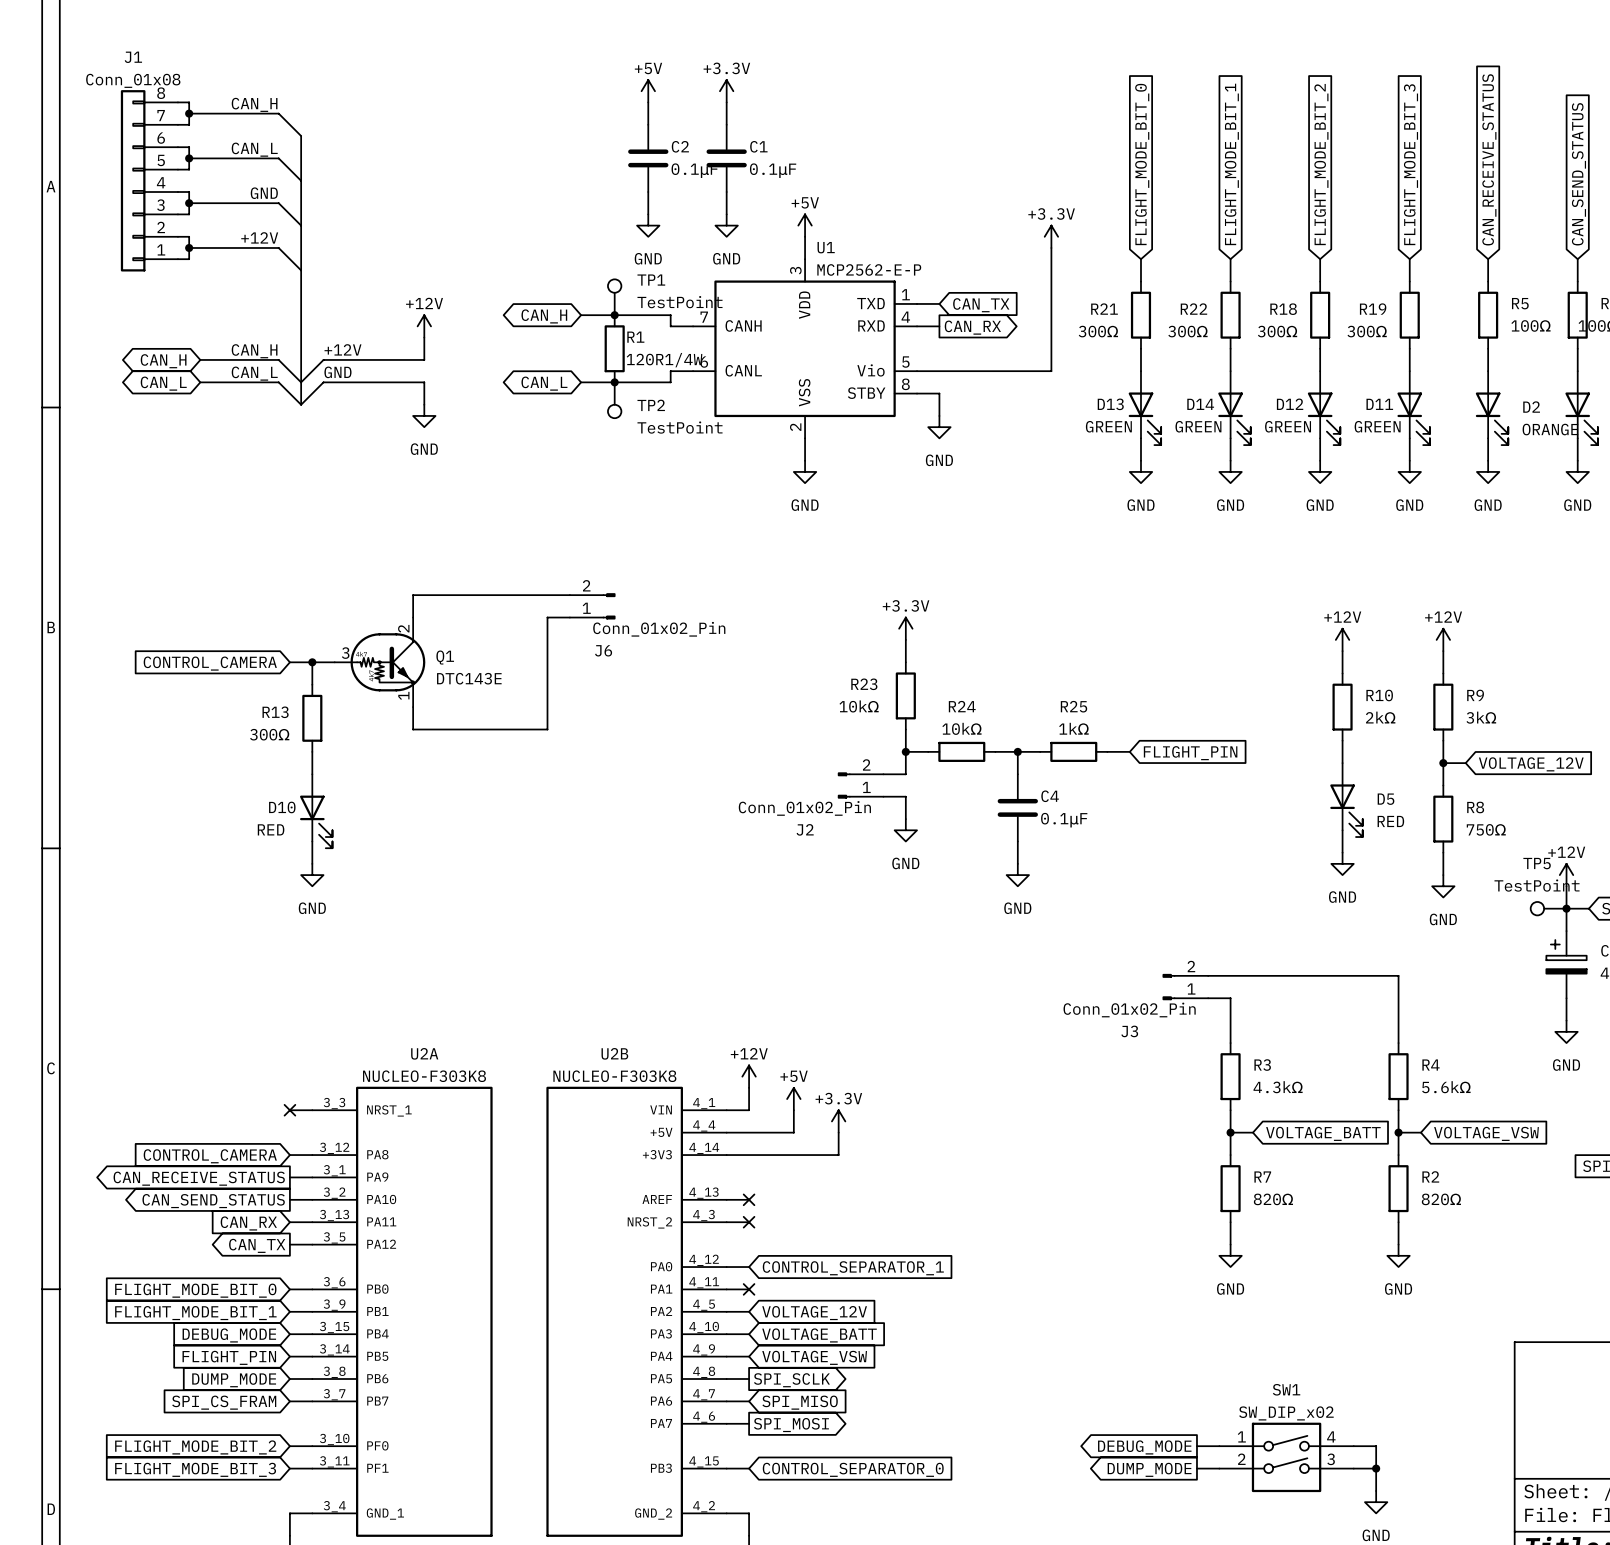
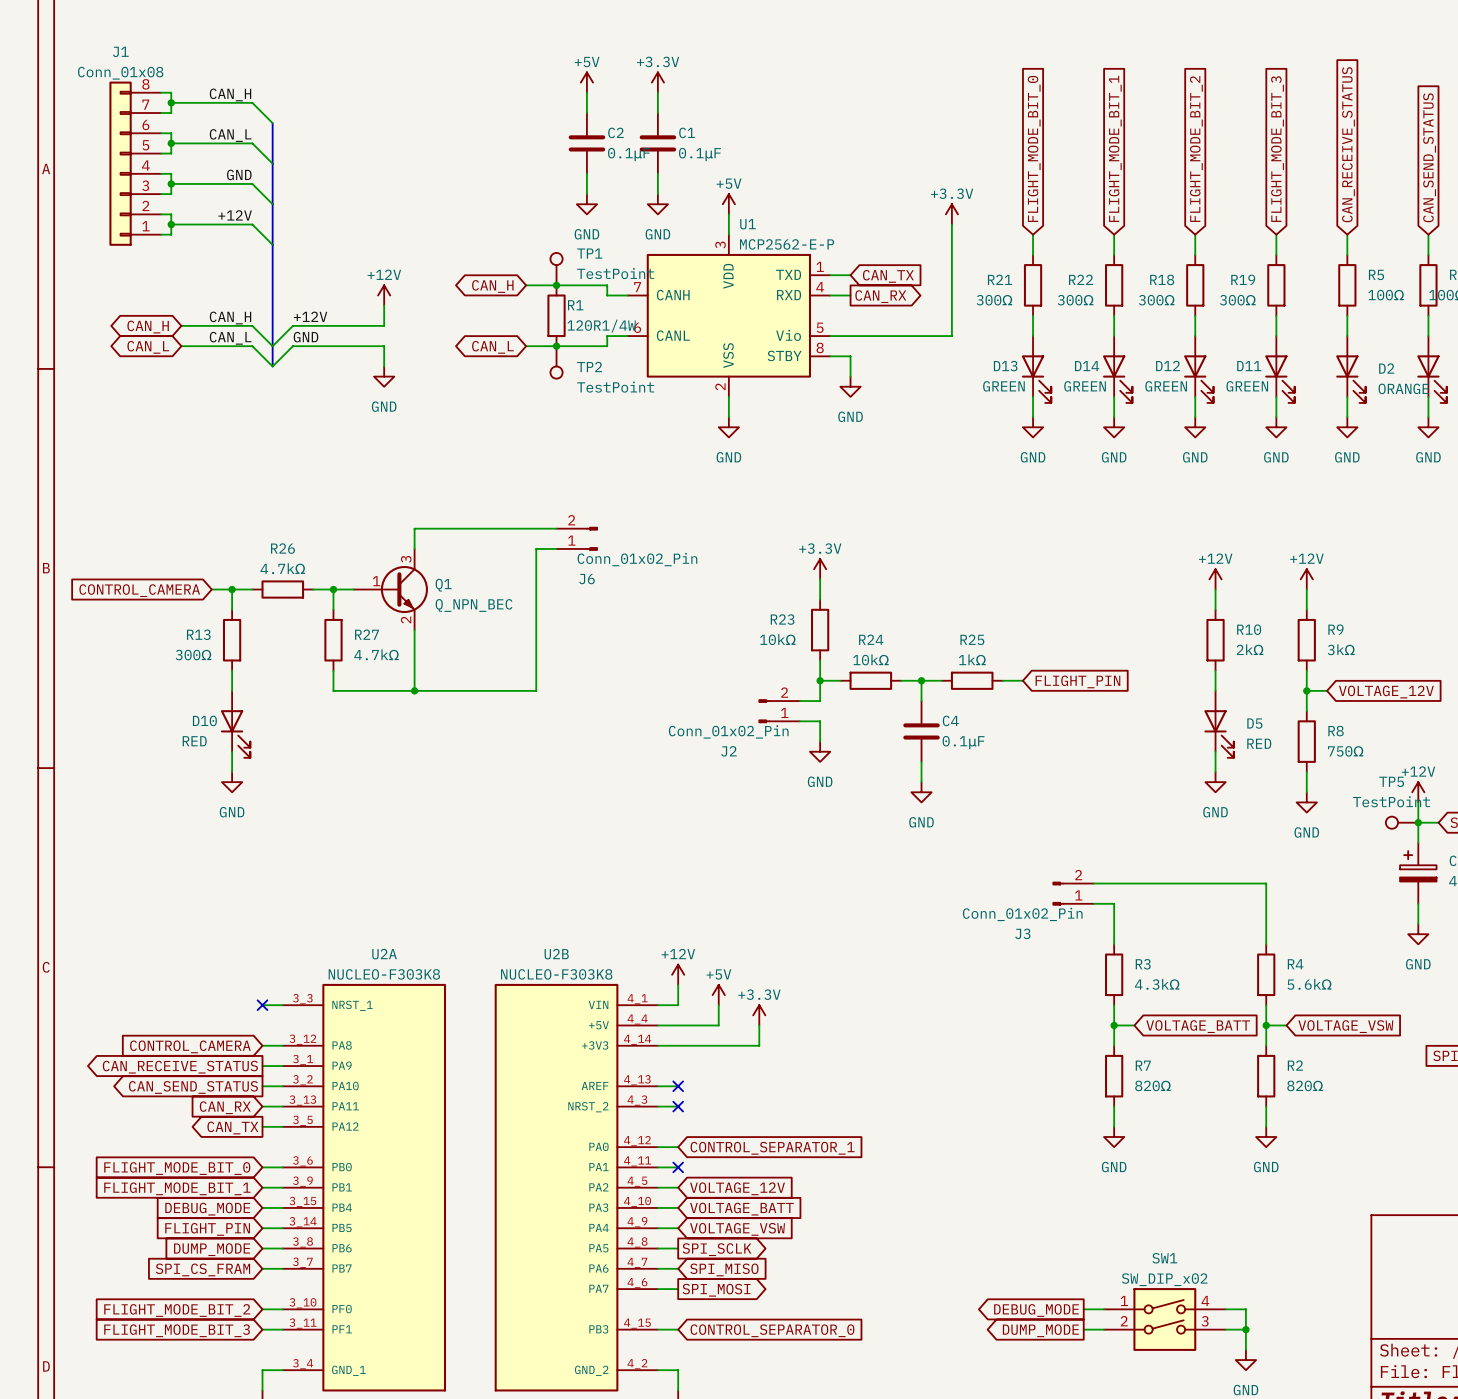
wire: (569, 595) (413, 595) (413, 617) -> (556, 528) (414, 528) (414, 548)
J6 position: (592, 606) -> (577, 538)
wire: none -> (556, 548) (536, 548) (536, 690) (333, 690) (333, 670)
Q1 symbol: [334, 617, 426, 708] -> [353, 548, 428, 631]
wire: (569, 617) (547, 617) (547, 729) (413, 729) (413, 707) -> none
junction: none -> (232, 589)
R26: none -> 4.7kΩ (282, 589)
wire: none -> (313, 589) (353, 589)
wire: none -> (333, 589) (333, 609)
junction: none -> (333, 589)
wire: (312, 662) (312, 684) -> (232, 589) (232, 609)
junction: (312, 662) -> none
global label position: CONTROL_CAMERA (210, 663) -> CONTROL_CAMERA (139, 590)
Q1 value: DTC143E (469, 678) -> Q_NPN_BEC (474, 605)
wire: none -> (414, 630) (414, 690)
R27: none -> 4.7kΩ (333, 640)
R13 position: (312, 718) -> (232, 640)
wire: (312, 751) (312, 774) -> (232, 670) (232, 690)
junction: none -> (414, 690)
D10 position: (316, 811) -> (235, 724)
wire: (312, 841) (312, 863) -> (232, 751) (232, 772)
power symbol position: GND (312, 875) -> GND (232, 782)

